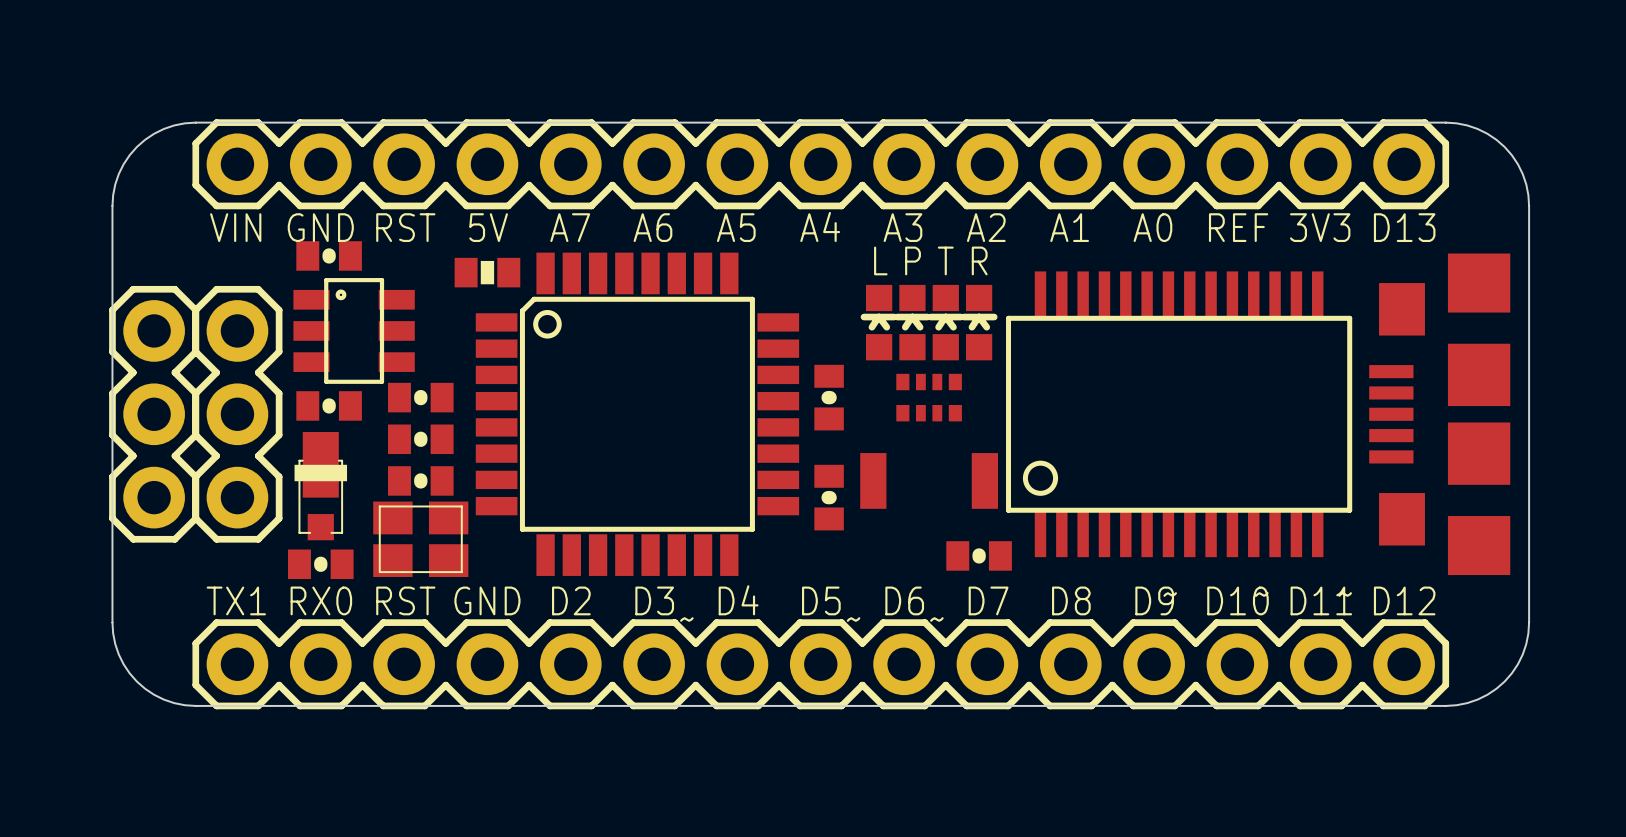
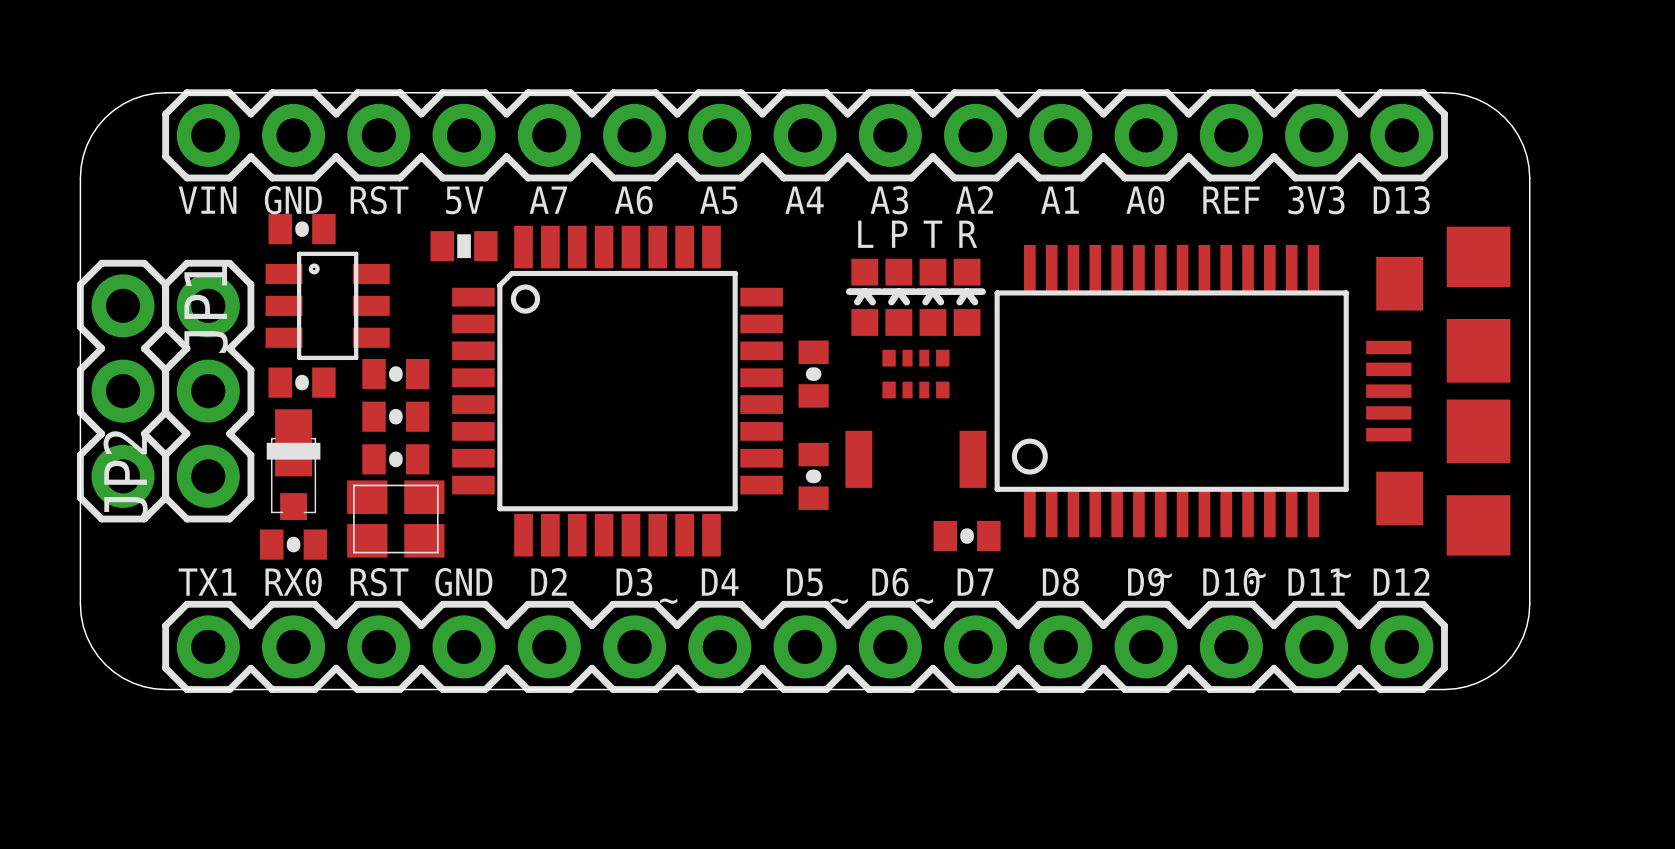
JP1 name: none -> JP1 (206, 308)
JP2 name: none -> JP2 (125, 474)

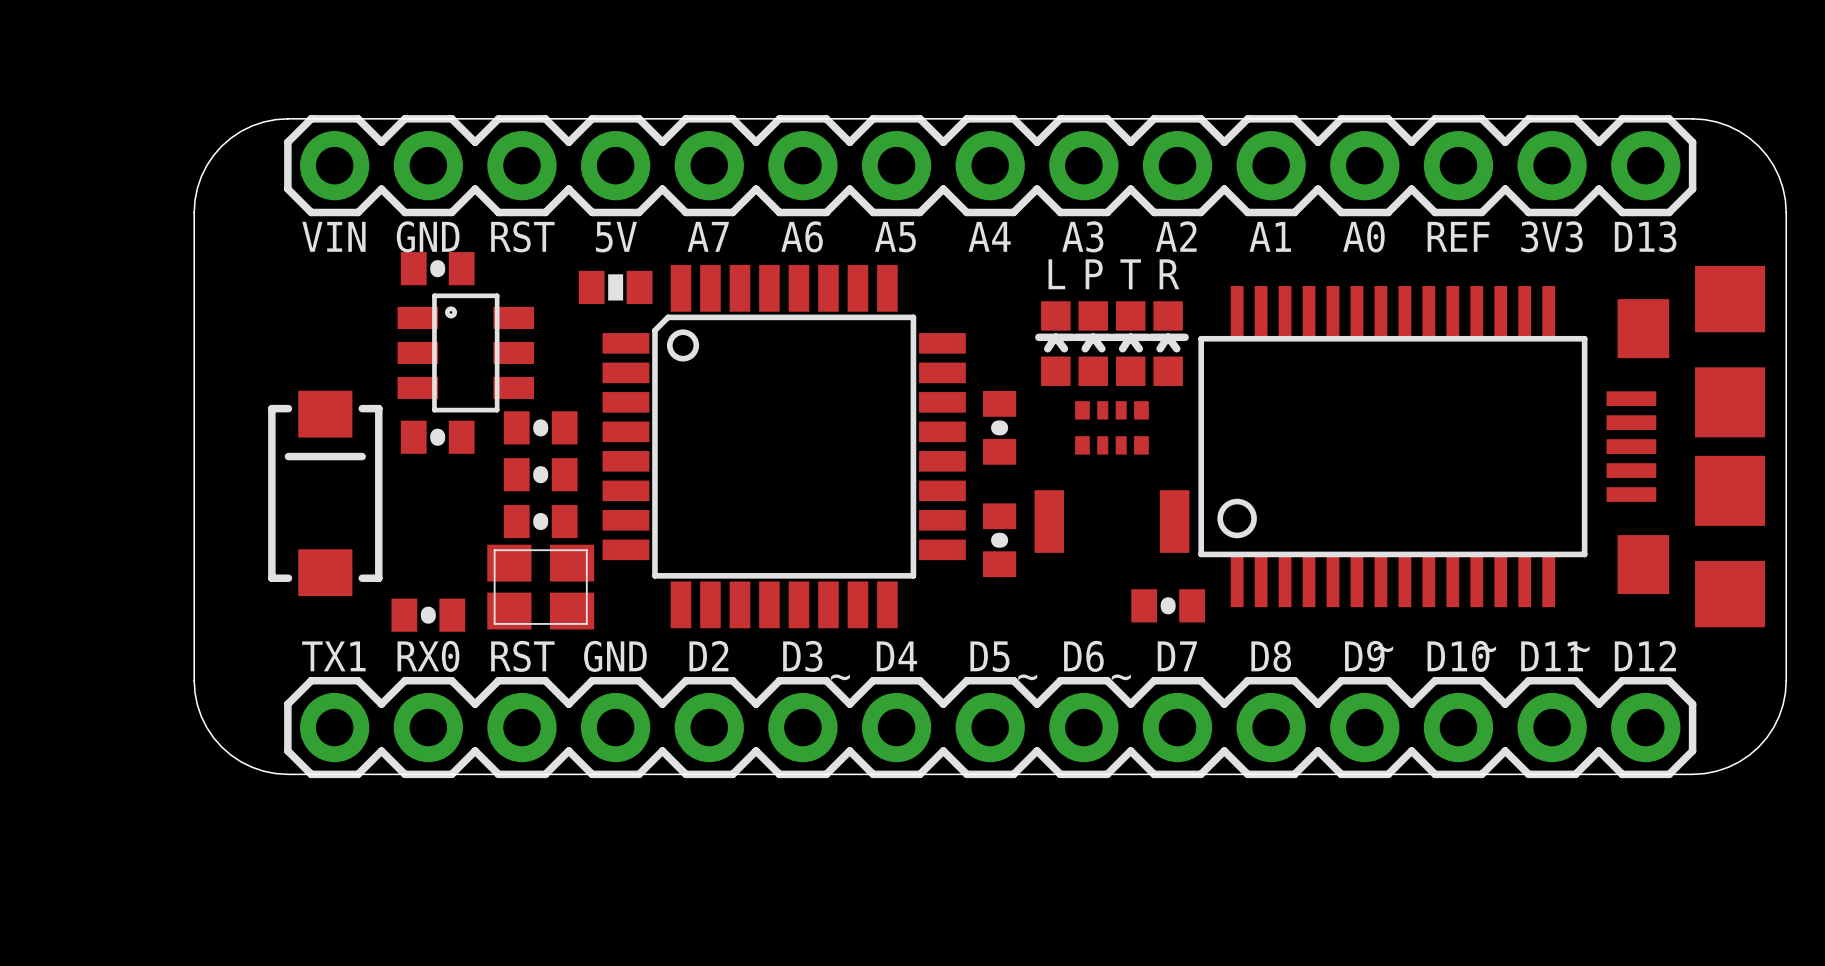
JP1: (123, 391) -> none
JP2: (208, 391) -> none
part: none -> (325, 493)
part: (293, 464) -> none

